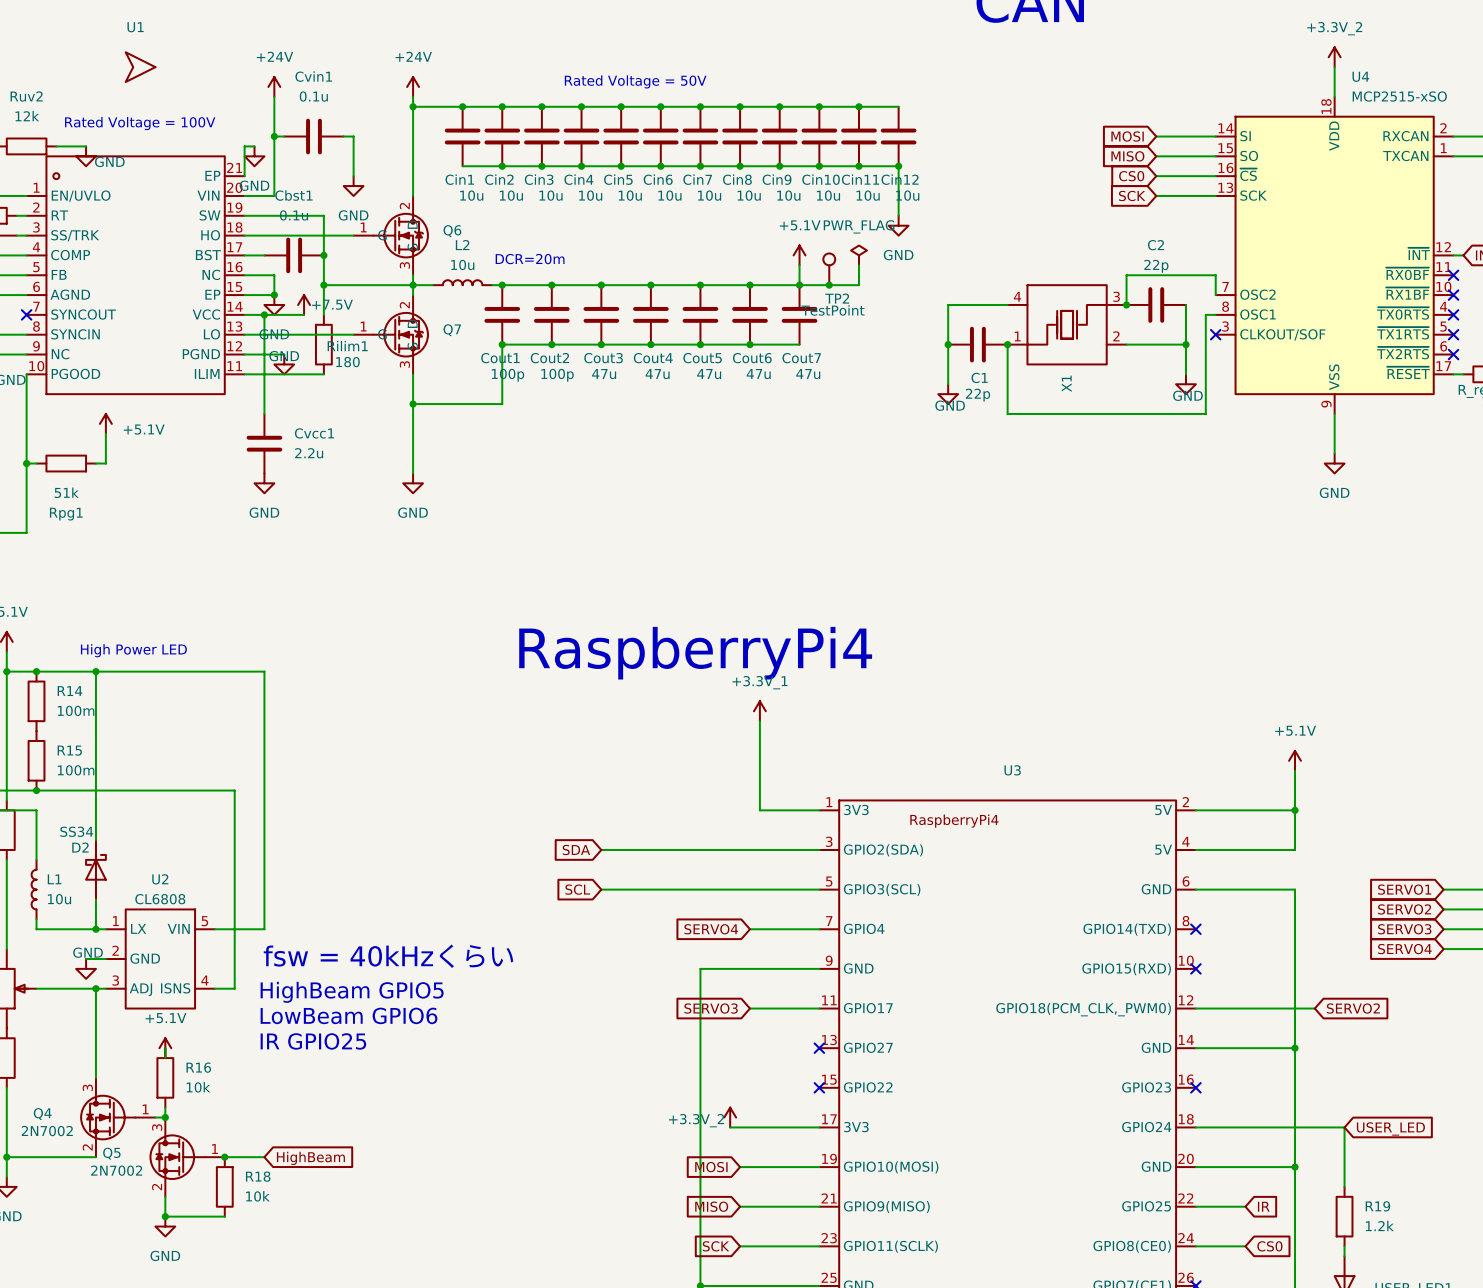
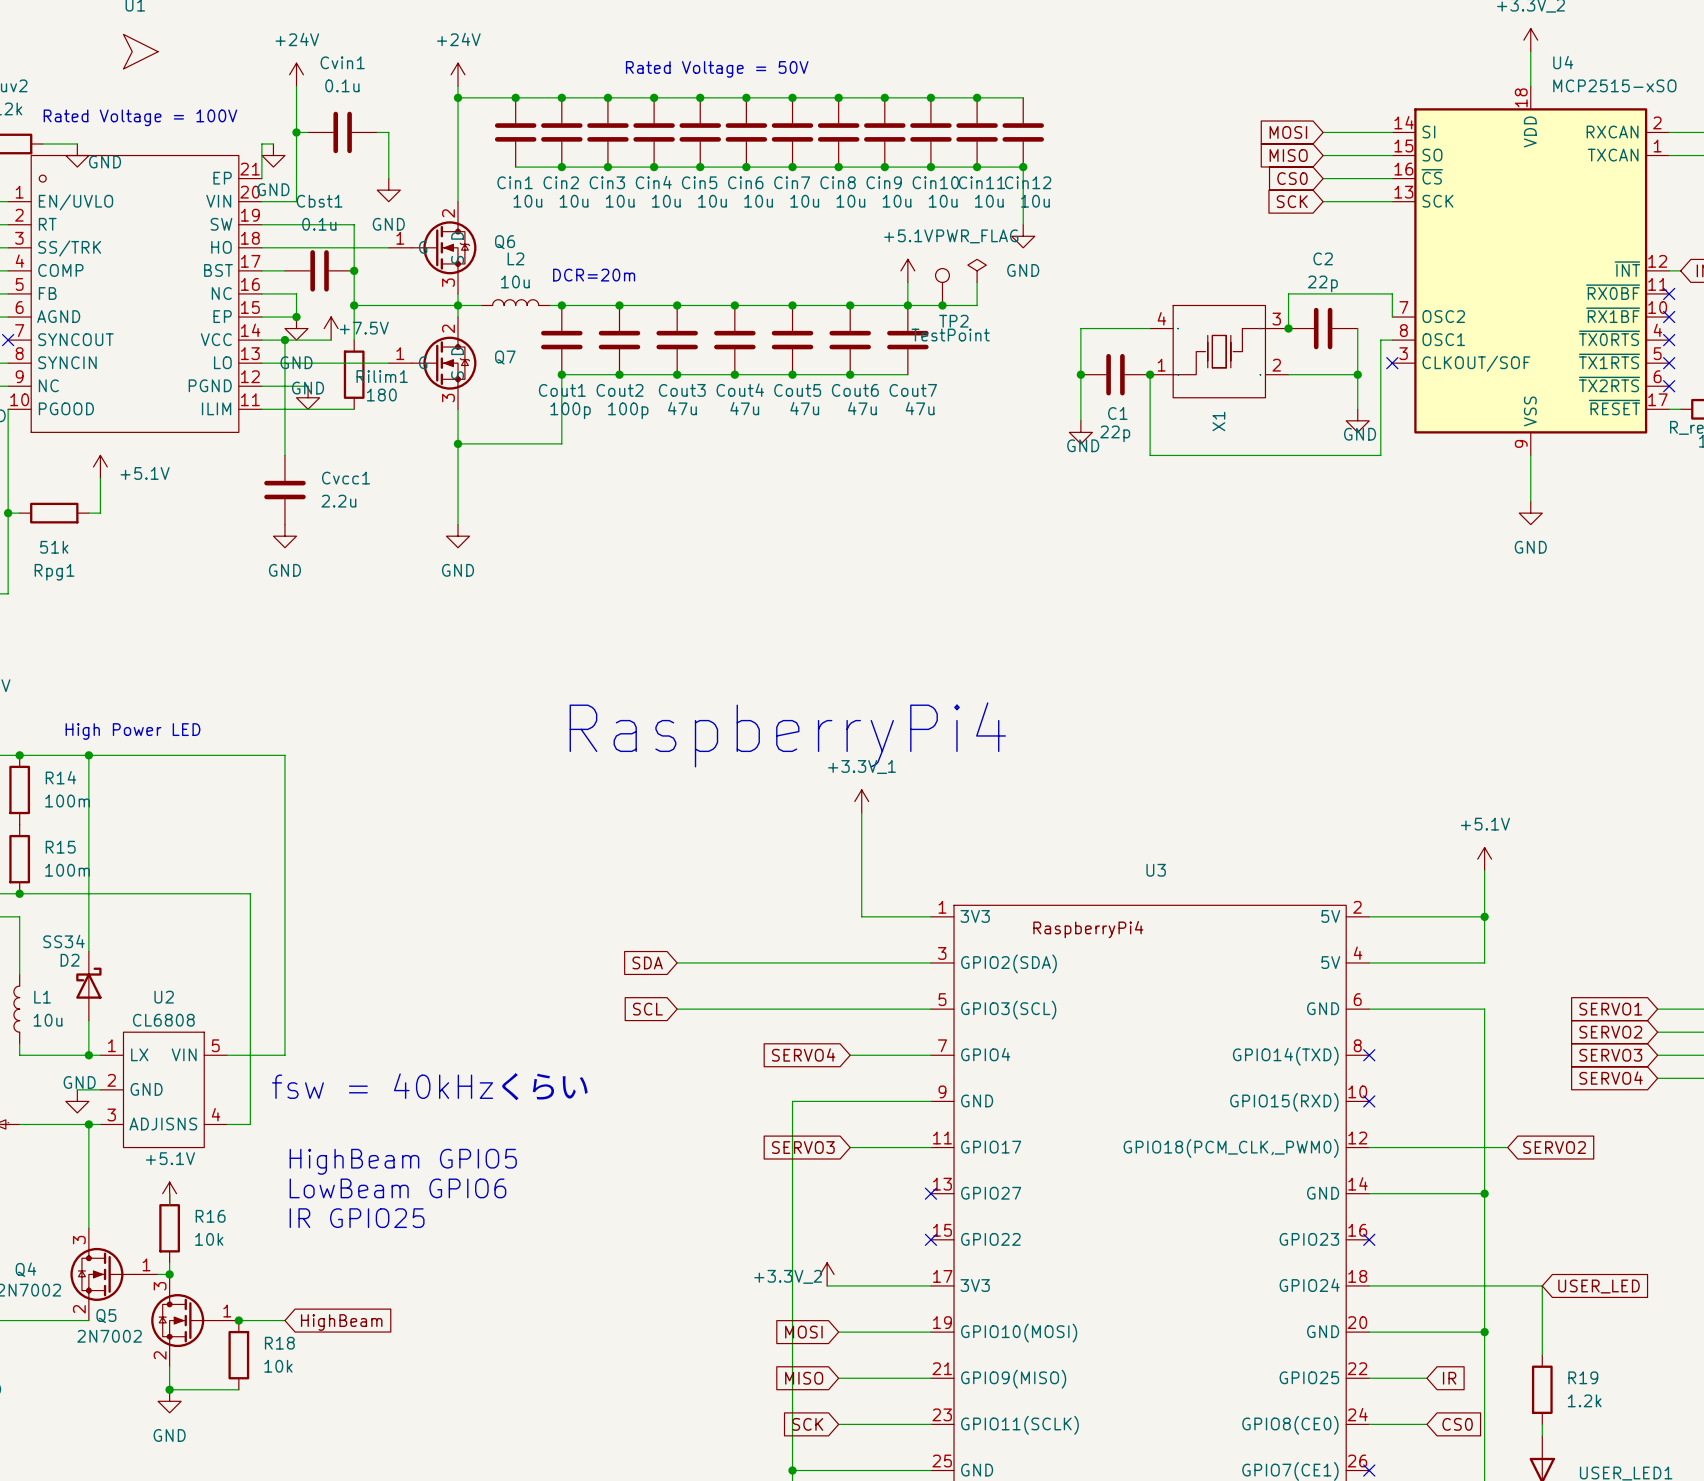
text: HighBeam GPIO5 (352, 992) -> none
text: LowBeam GPIO6 (349, 1015) -> HighBeam GPIO5 (403, 1161)
text: IR GPIO25 (313, 1041) -> LowBeam GPIO6 (397, 1188)
text: none -> IR GPIO25 (357, 1218)

